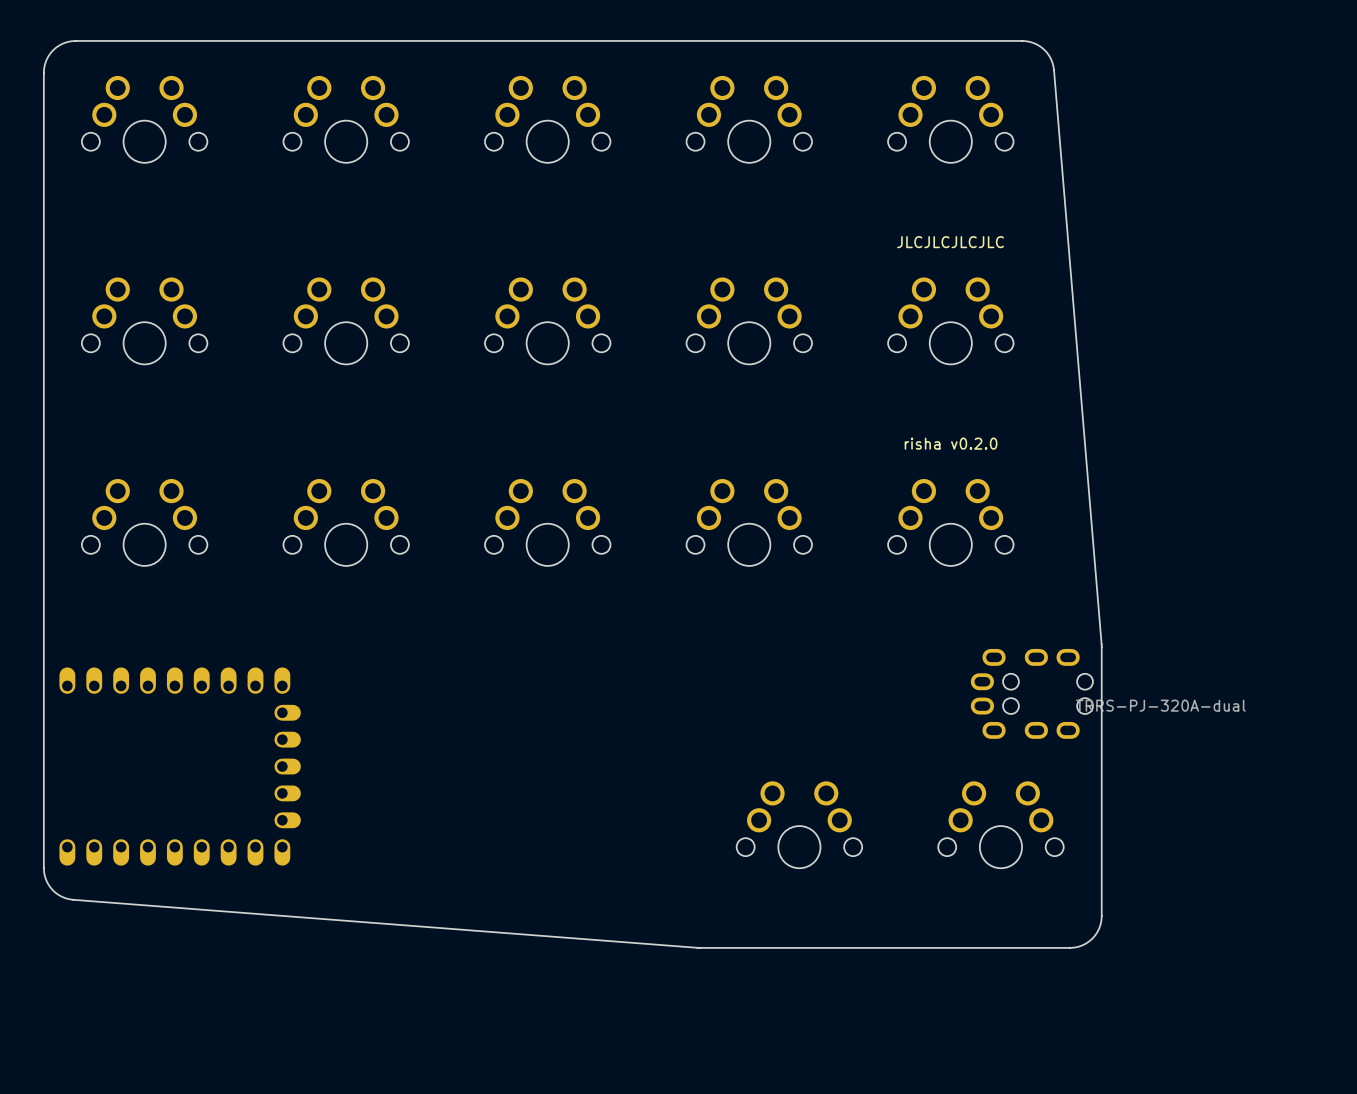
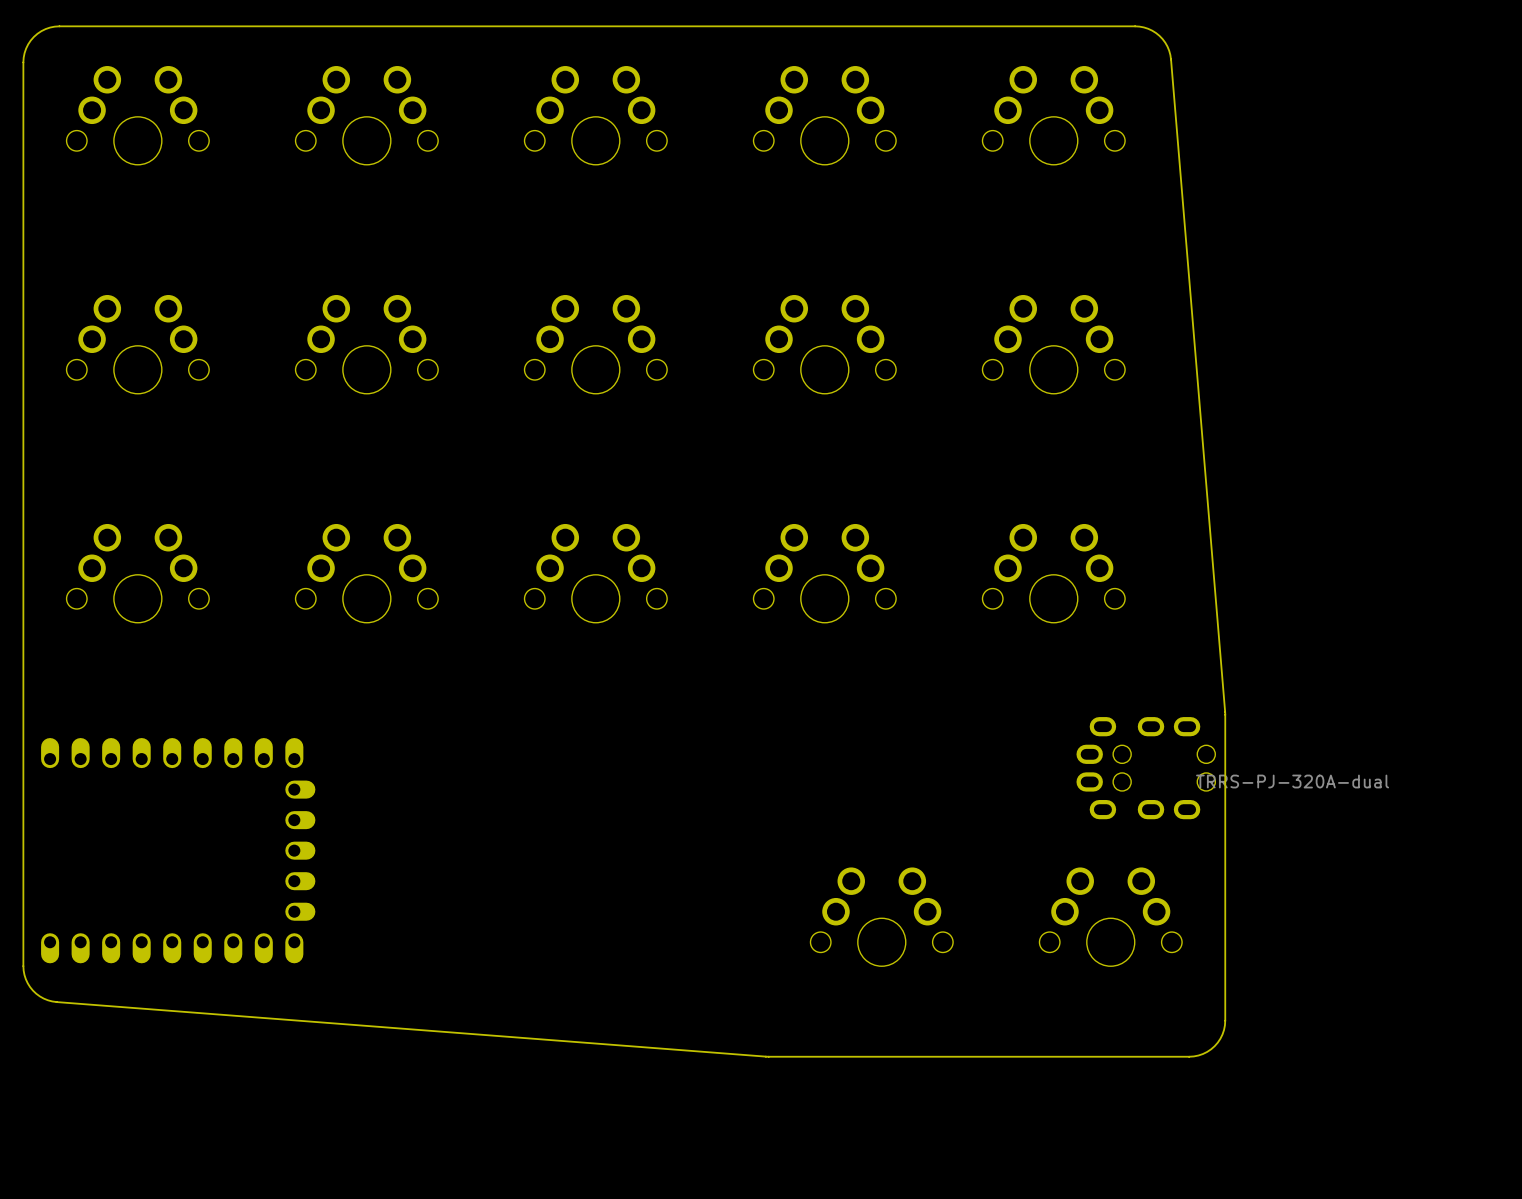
text: JLCJLCJLCJLC (950, 242) -> none
text: risha v0.2.0 (951, 443) -> none

